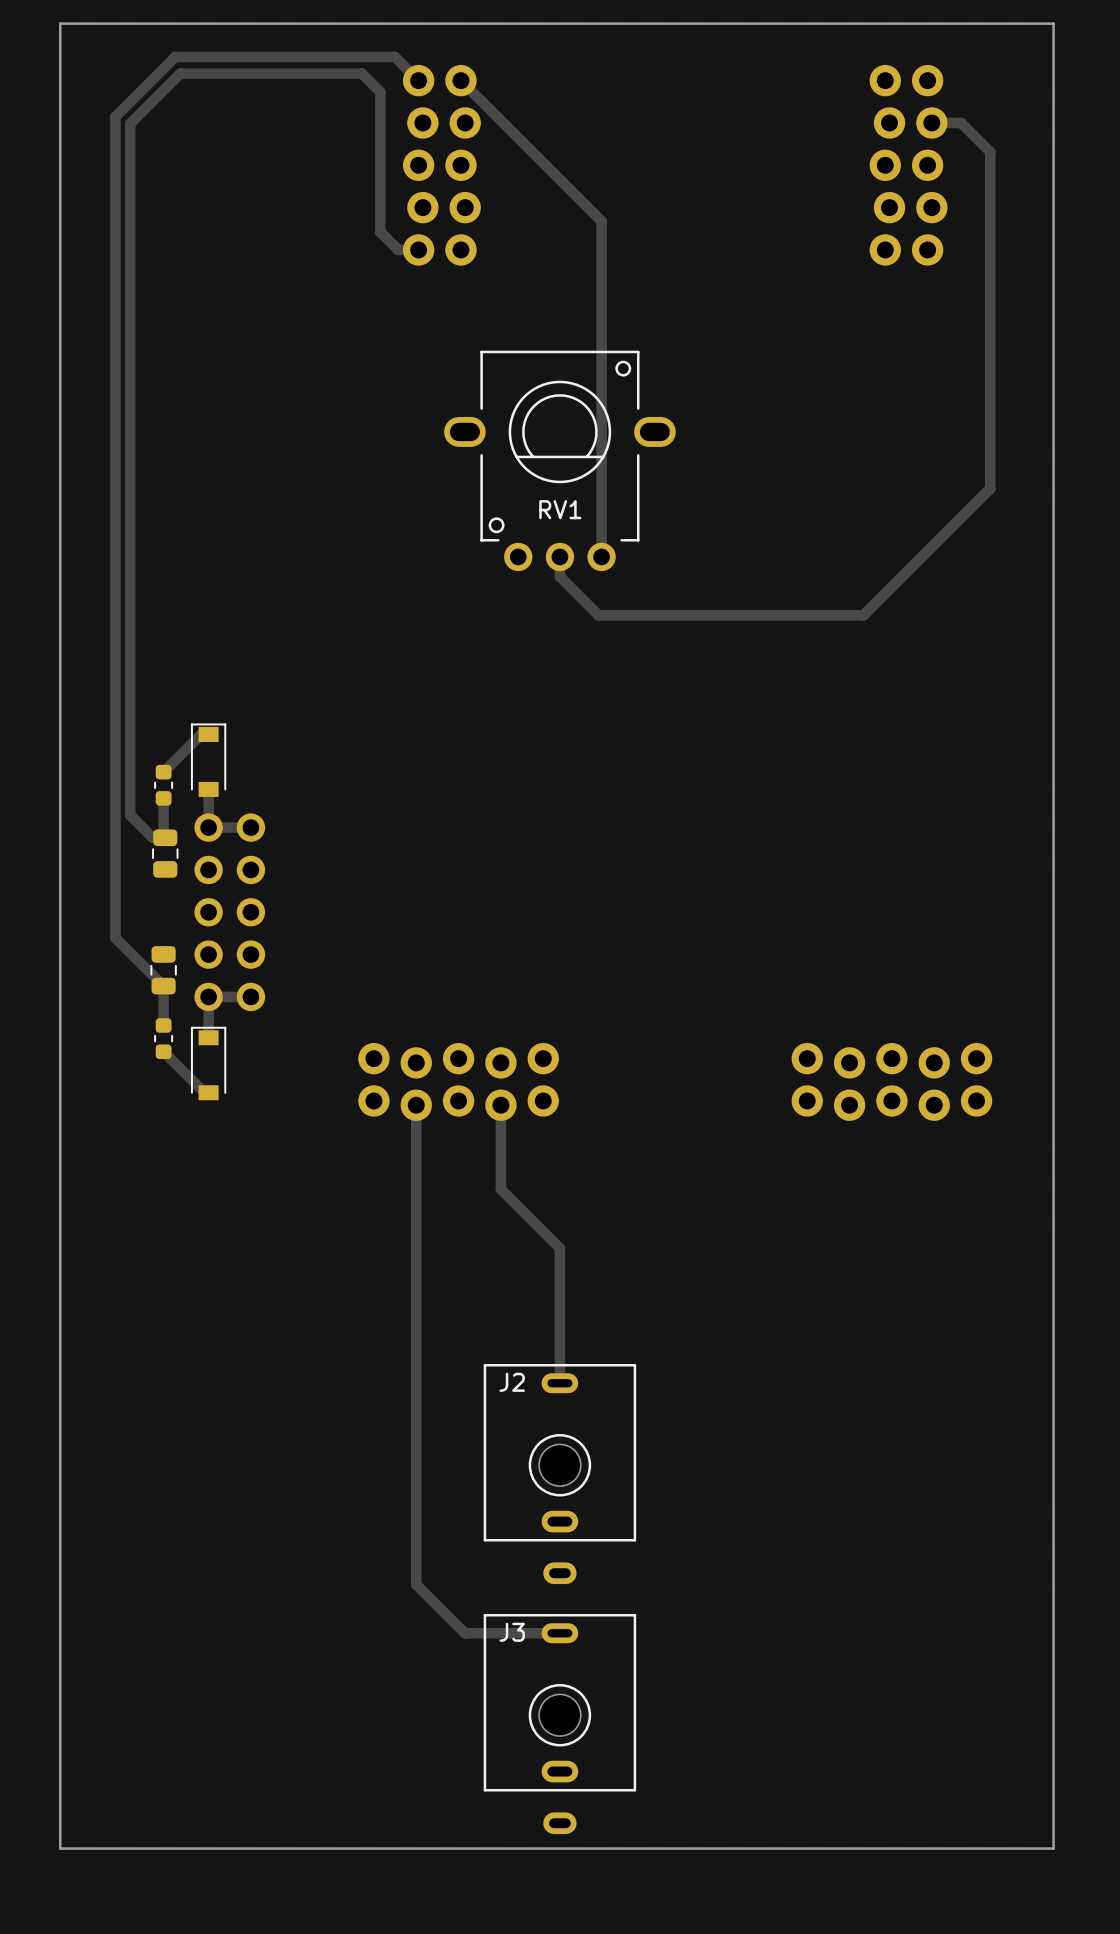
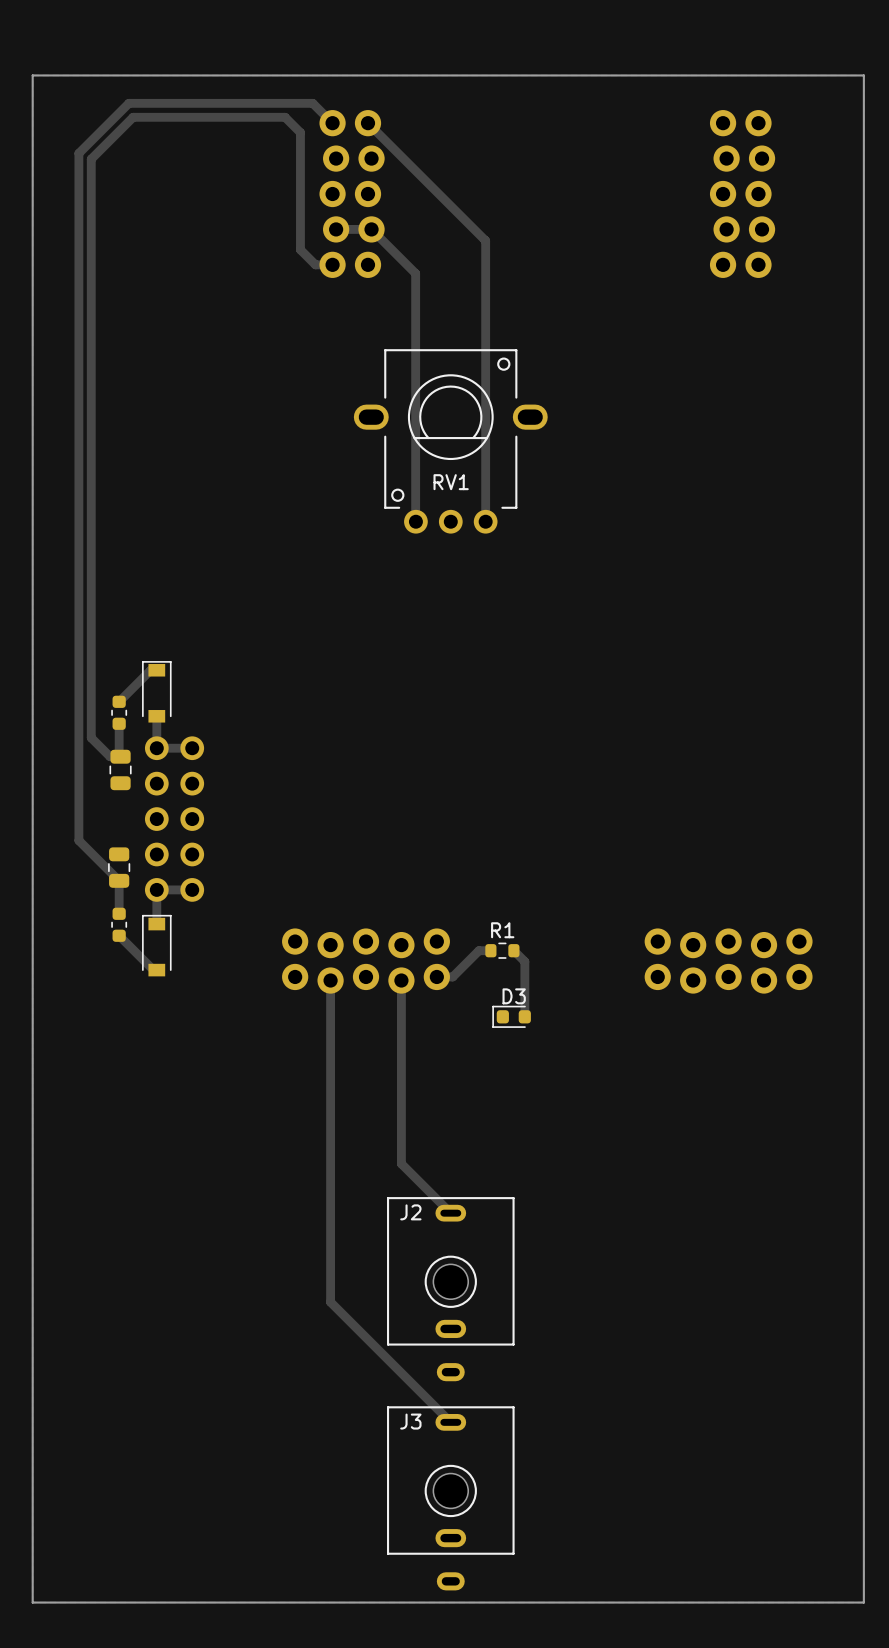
track: (931, 122) (961, 122) (990, 151) (990, 488) (863, 615) (598, 615) (559, 576) (559, 556) -> none
track: none -> (336, 229) (371, 229) (415, 273) (415, 521)
track: none -> (490, 950) (478, 950) (452, 976) (436, 976)
R1: none -> (502, 950)
track: none -> (513, 950) (524, 961) (524, 1016)
D3: none -> (511, 1016)
track: (500, 1189) (559, 1248) (559, 1383) -> (401, 1050) (401, 1163) (450, 1213)
track: (416, 1489) (416, 1584) (464, 1633) (559, 1633) -> (330, 1302) (450, 1422)

